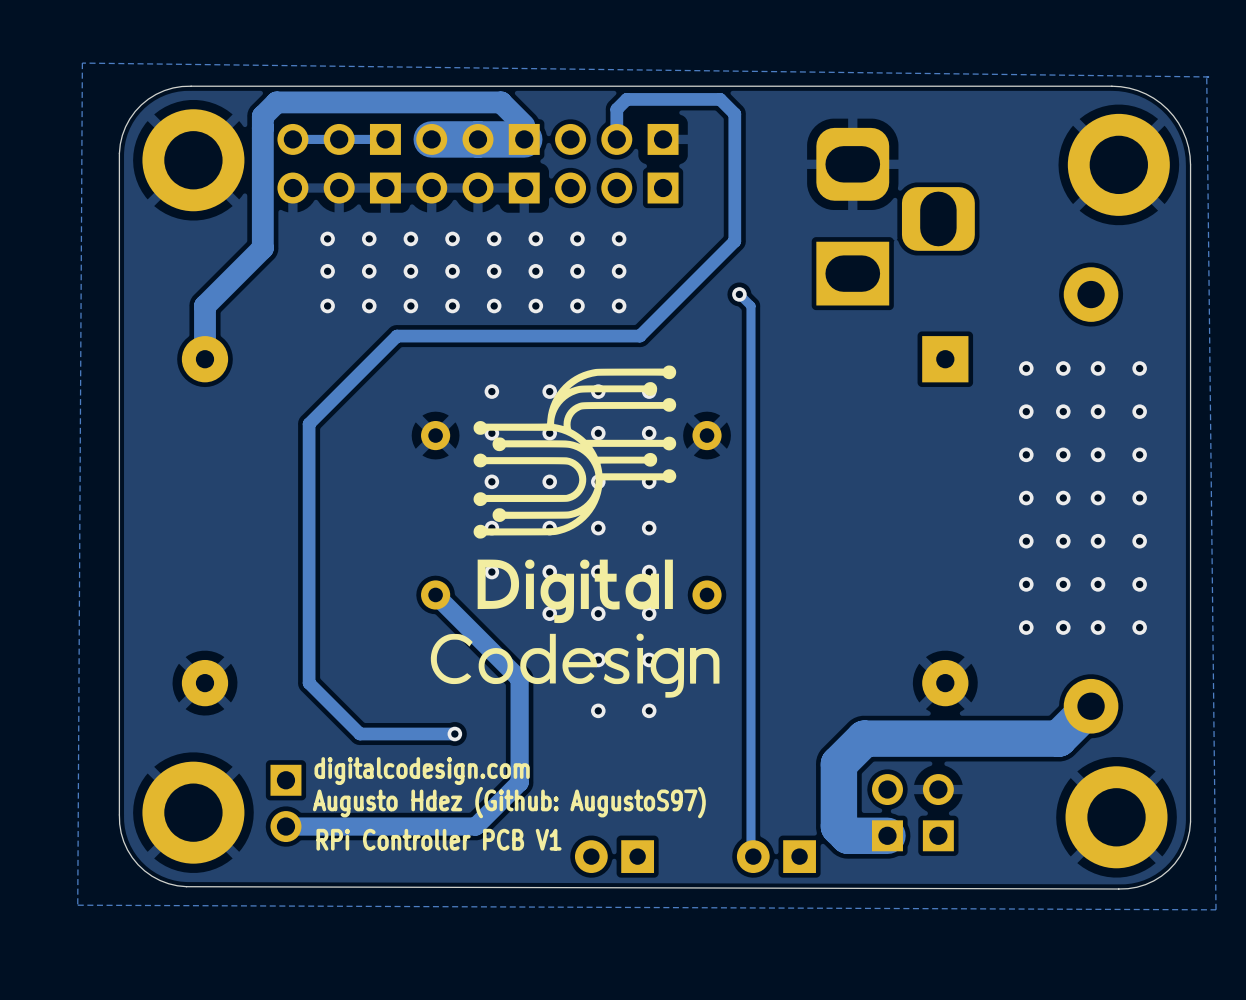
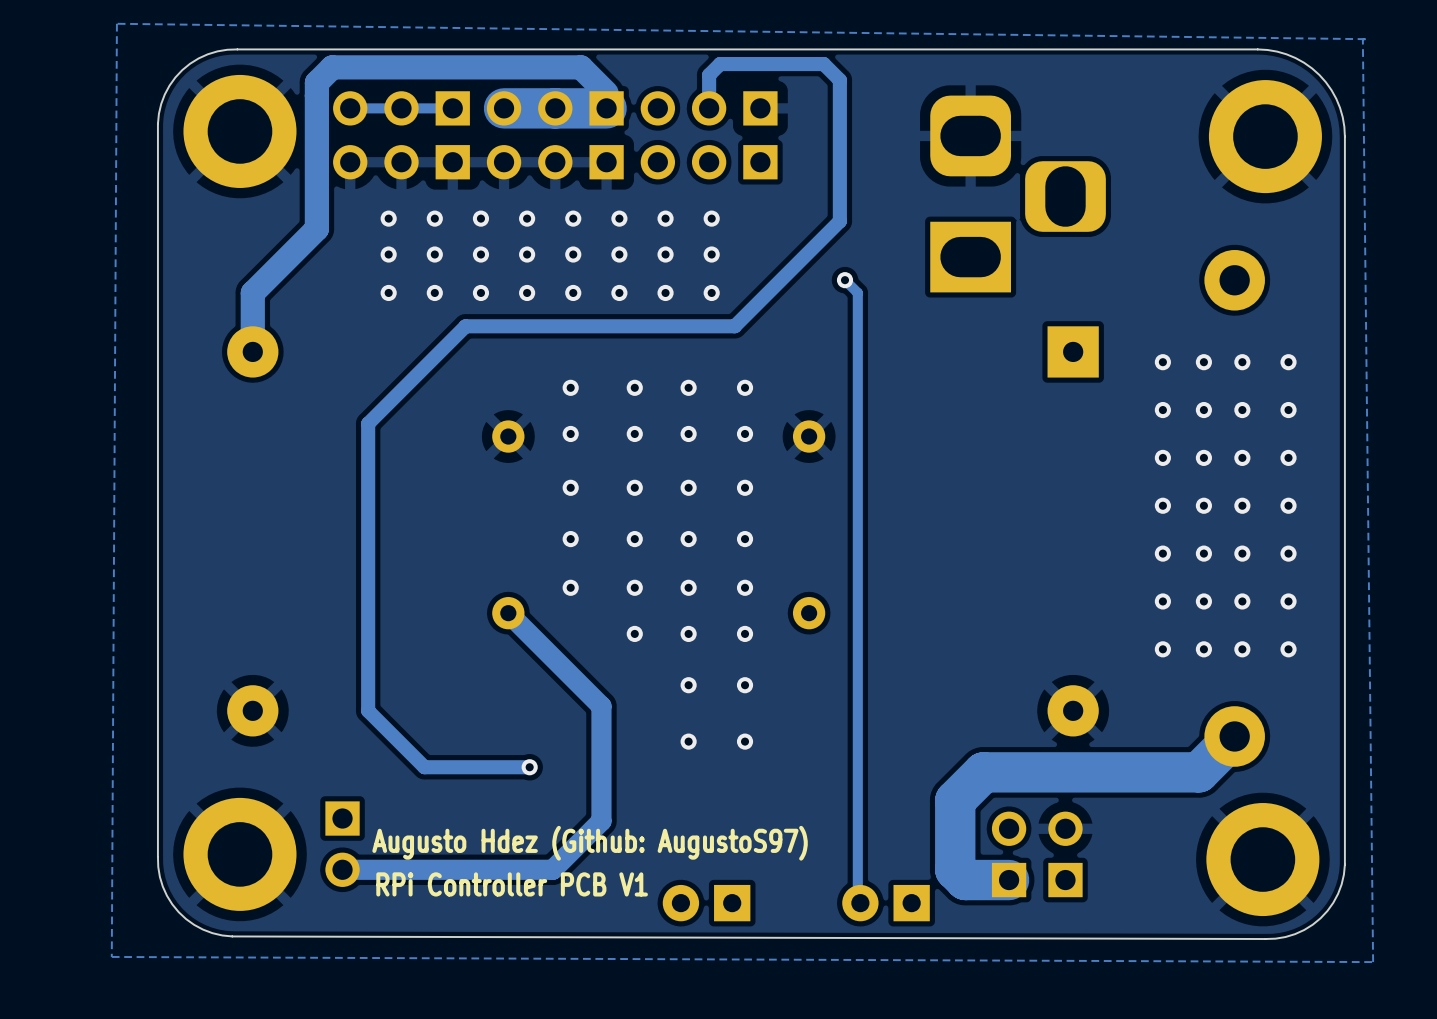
drawing: [430, 365, 720, 698] -> none
text: digitalcodesign.com (422, 771) -> none

